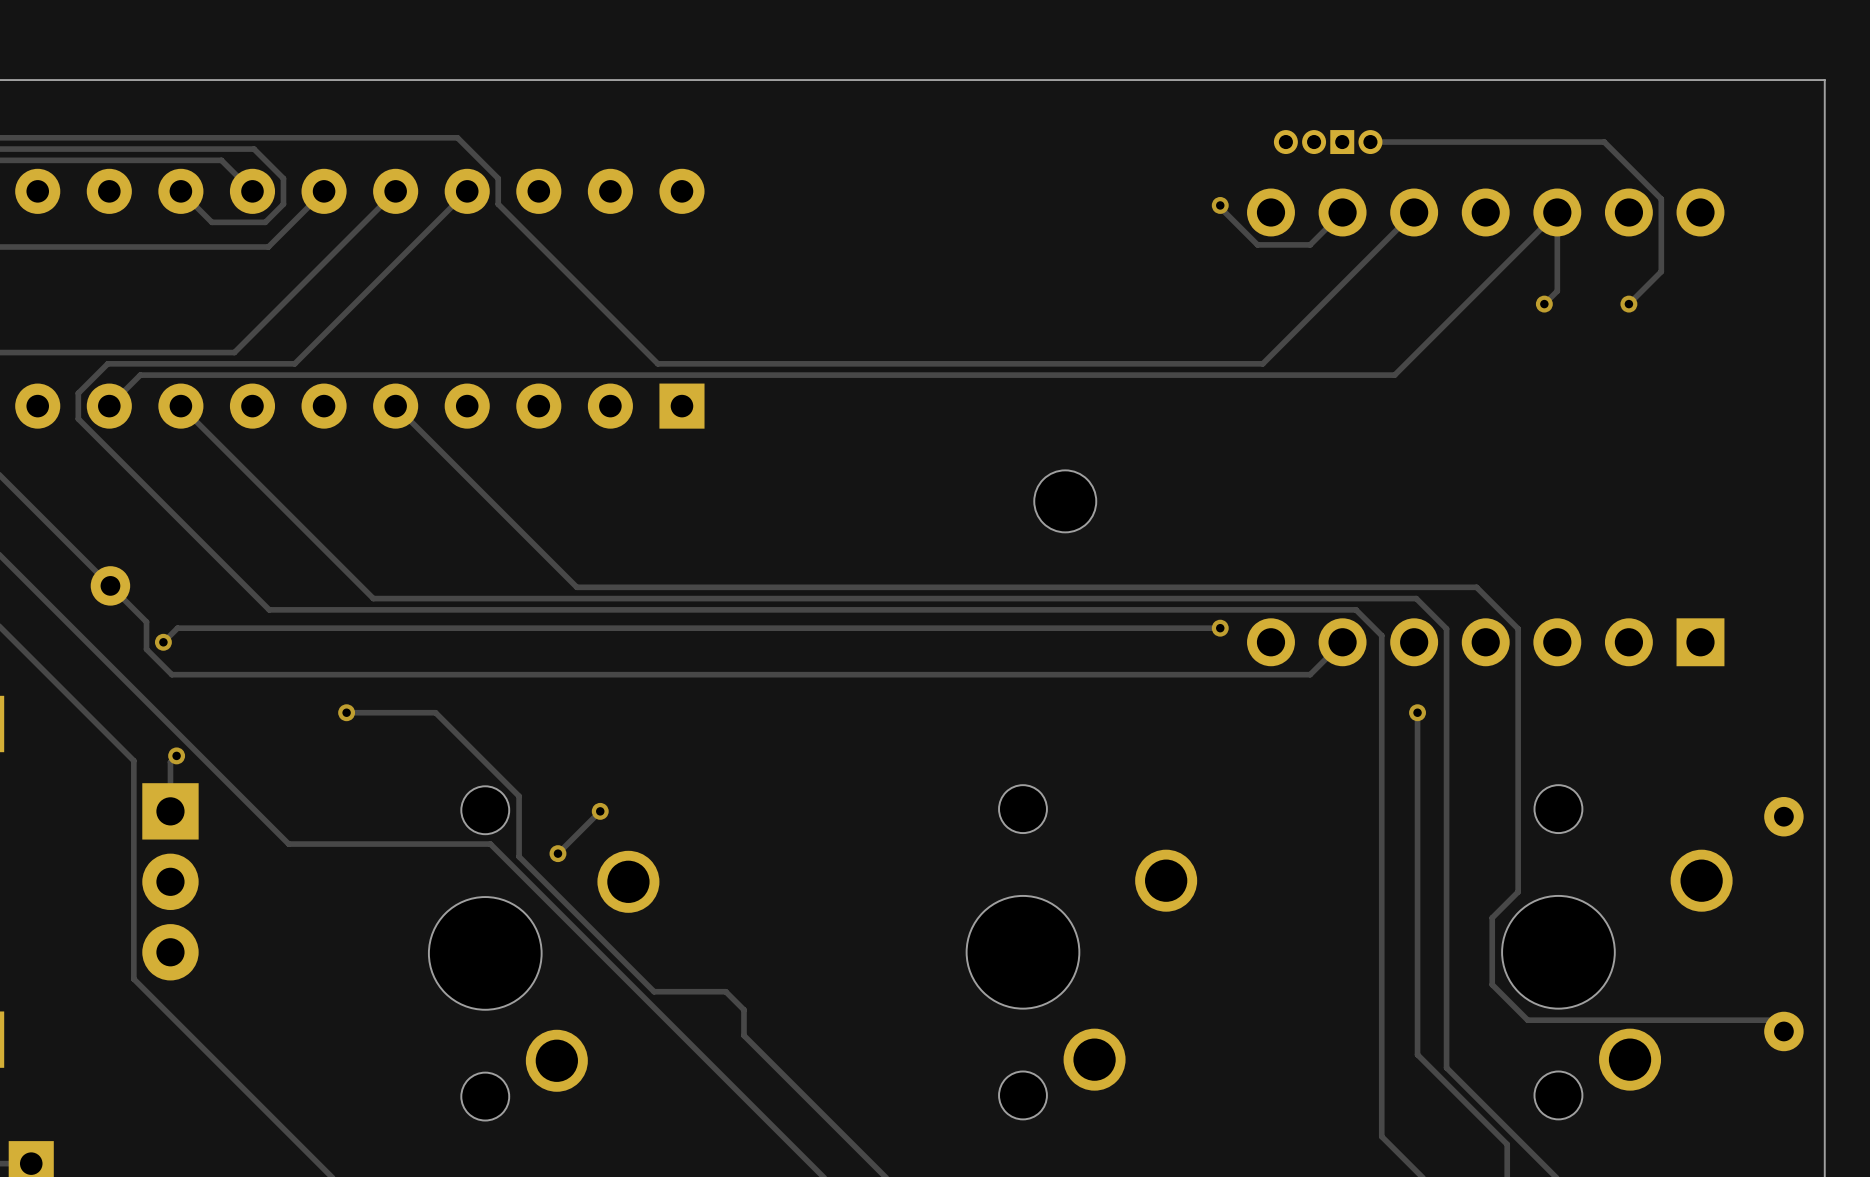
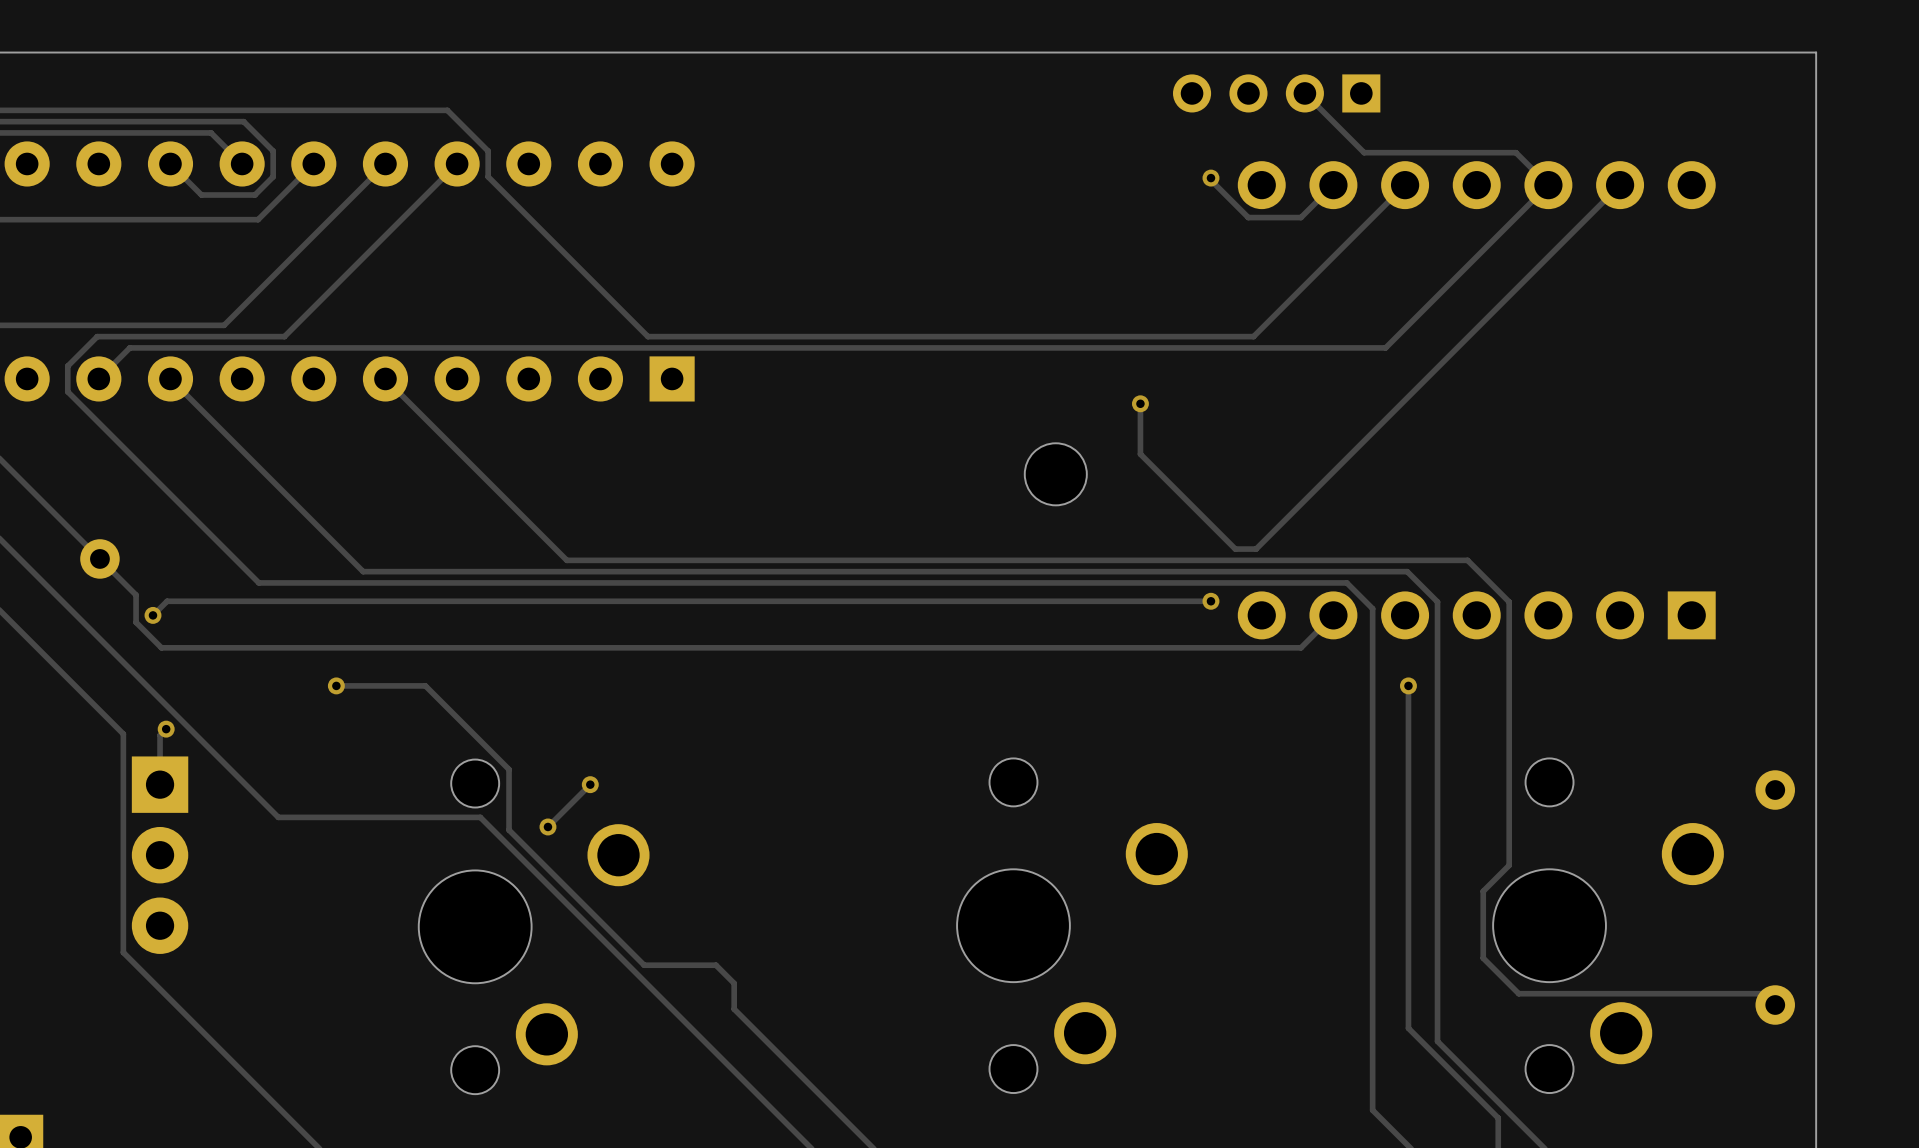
part: none -> (1276, 93)
part: (1328, 142) -> none
track: (1370, 142) (1604, 142) (1661, 199) (1661, 271) (1628, 304) -> none
track: (1557, 212) (1557, 291) (1544, 304) -> (1548, 185) (1515, 152) (1364, 152) (1304, 93)
track: none -> (1620, 185) (1256, 549) (1235, 549) (1140, 454) (1140, 403)
via: (1544, 304) -> none
via: (1628, 304) -> none
via: none -> (1140, 403)

